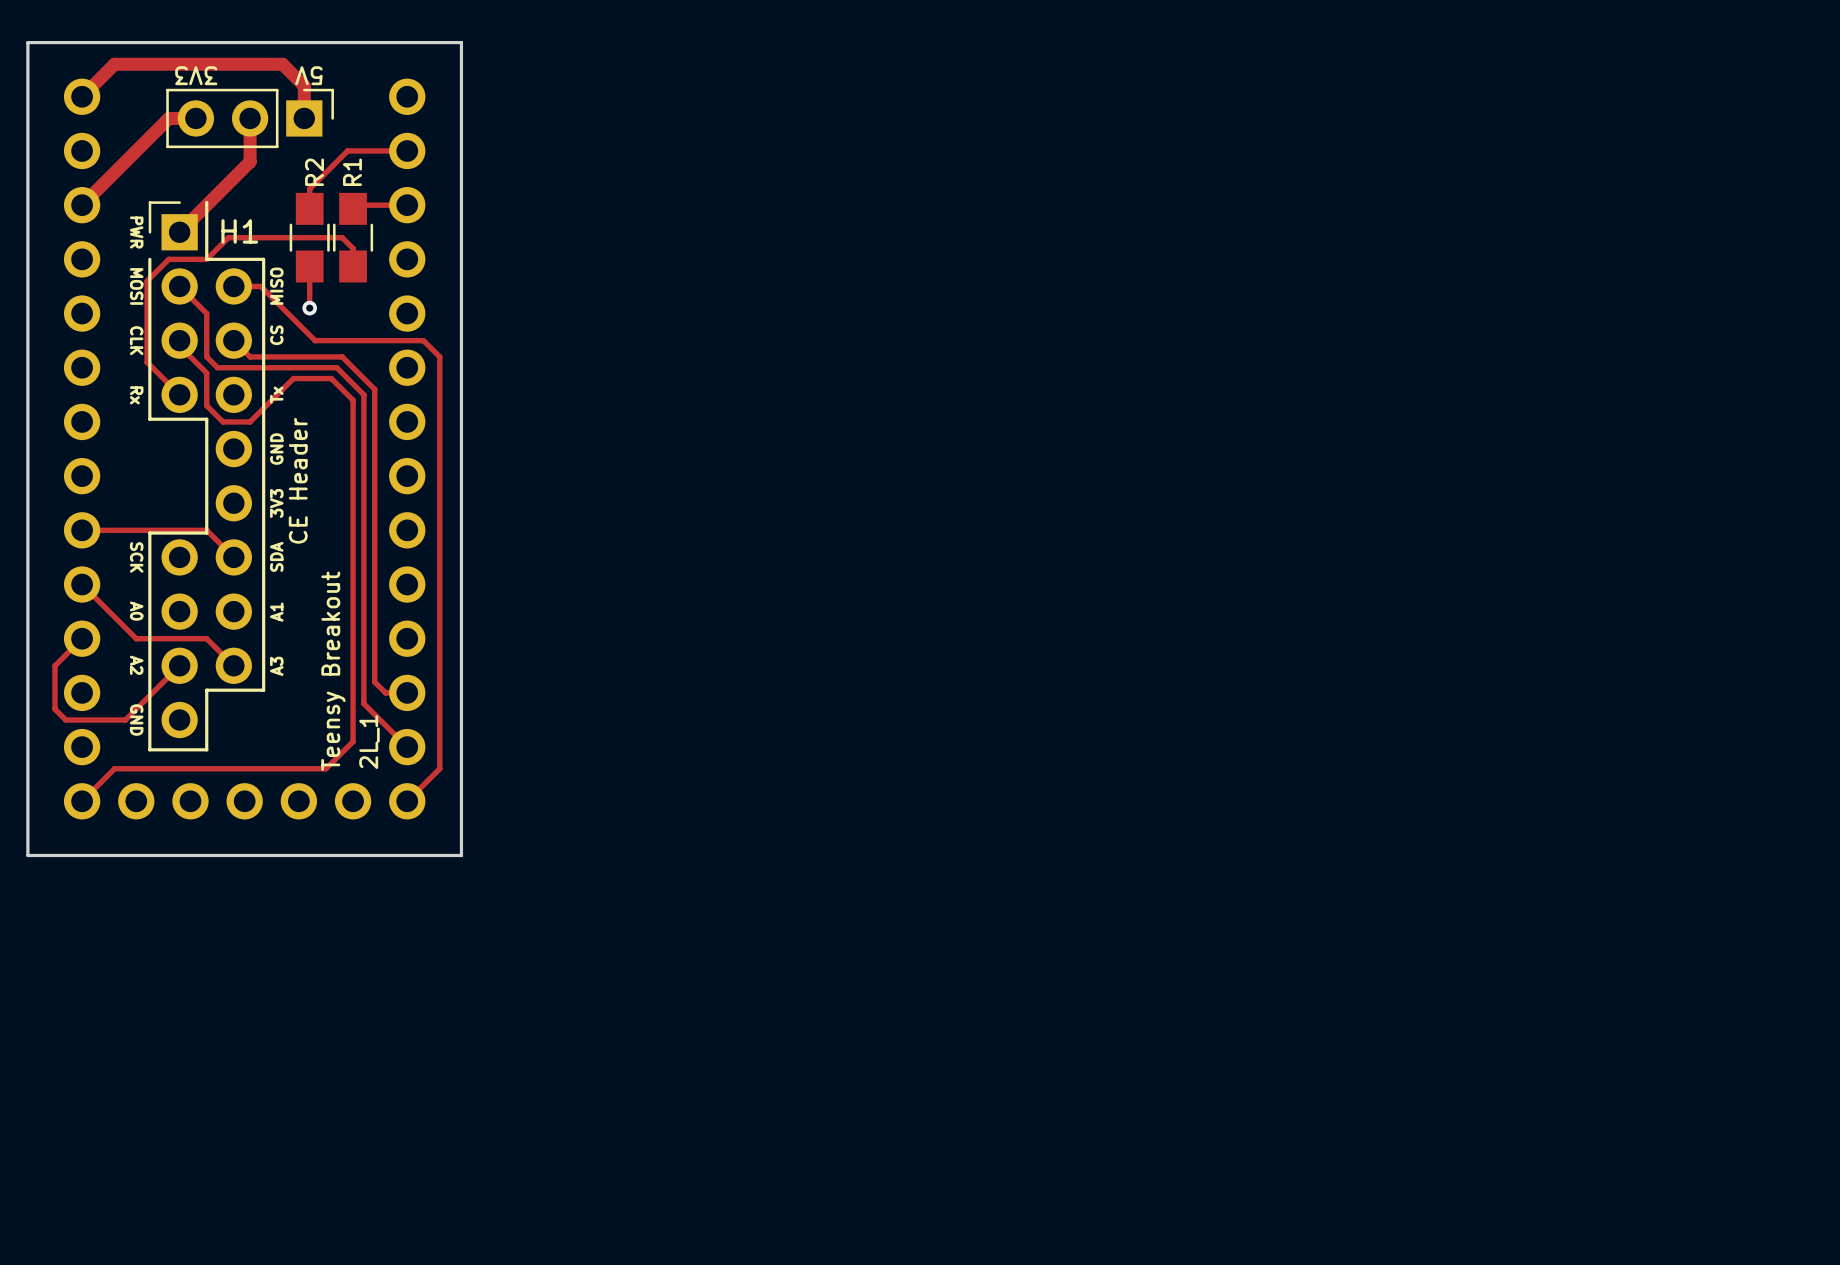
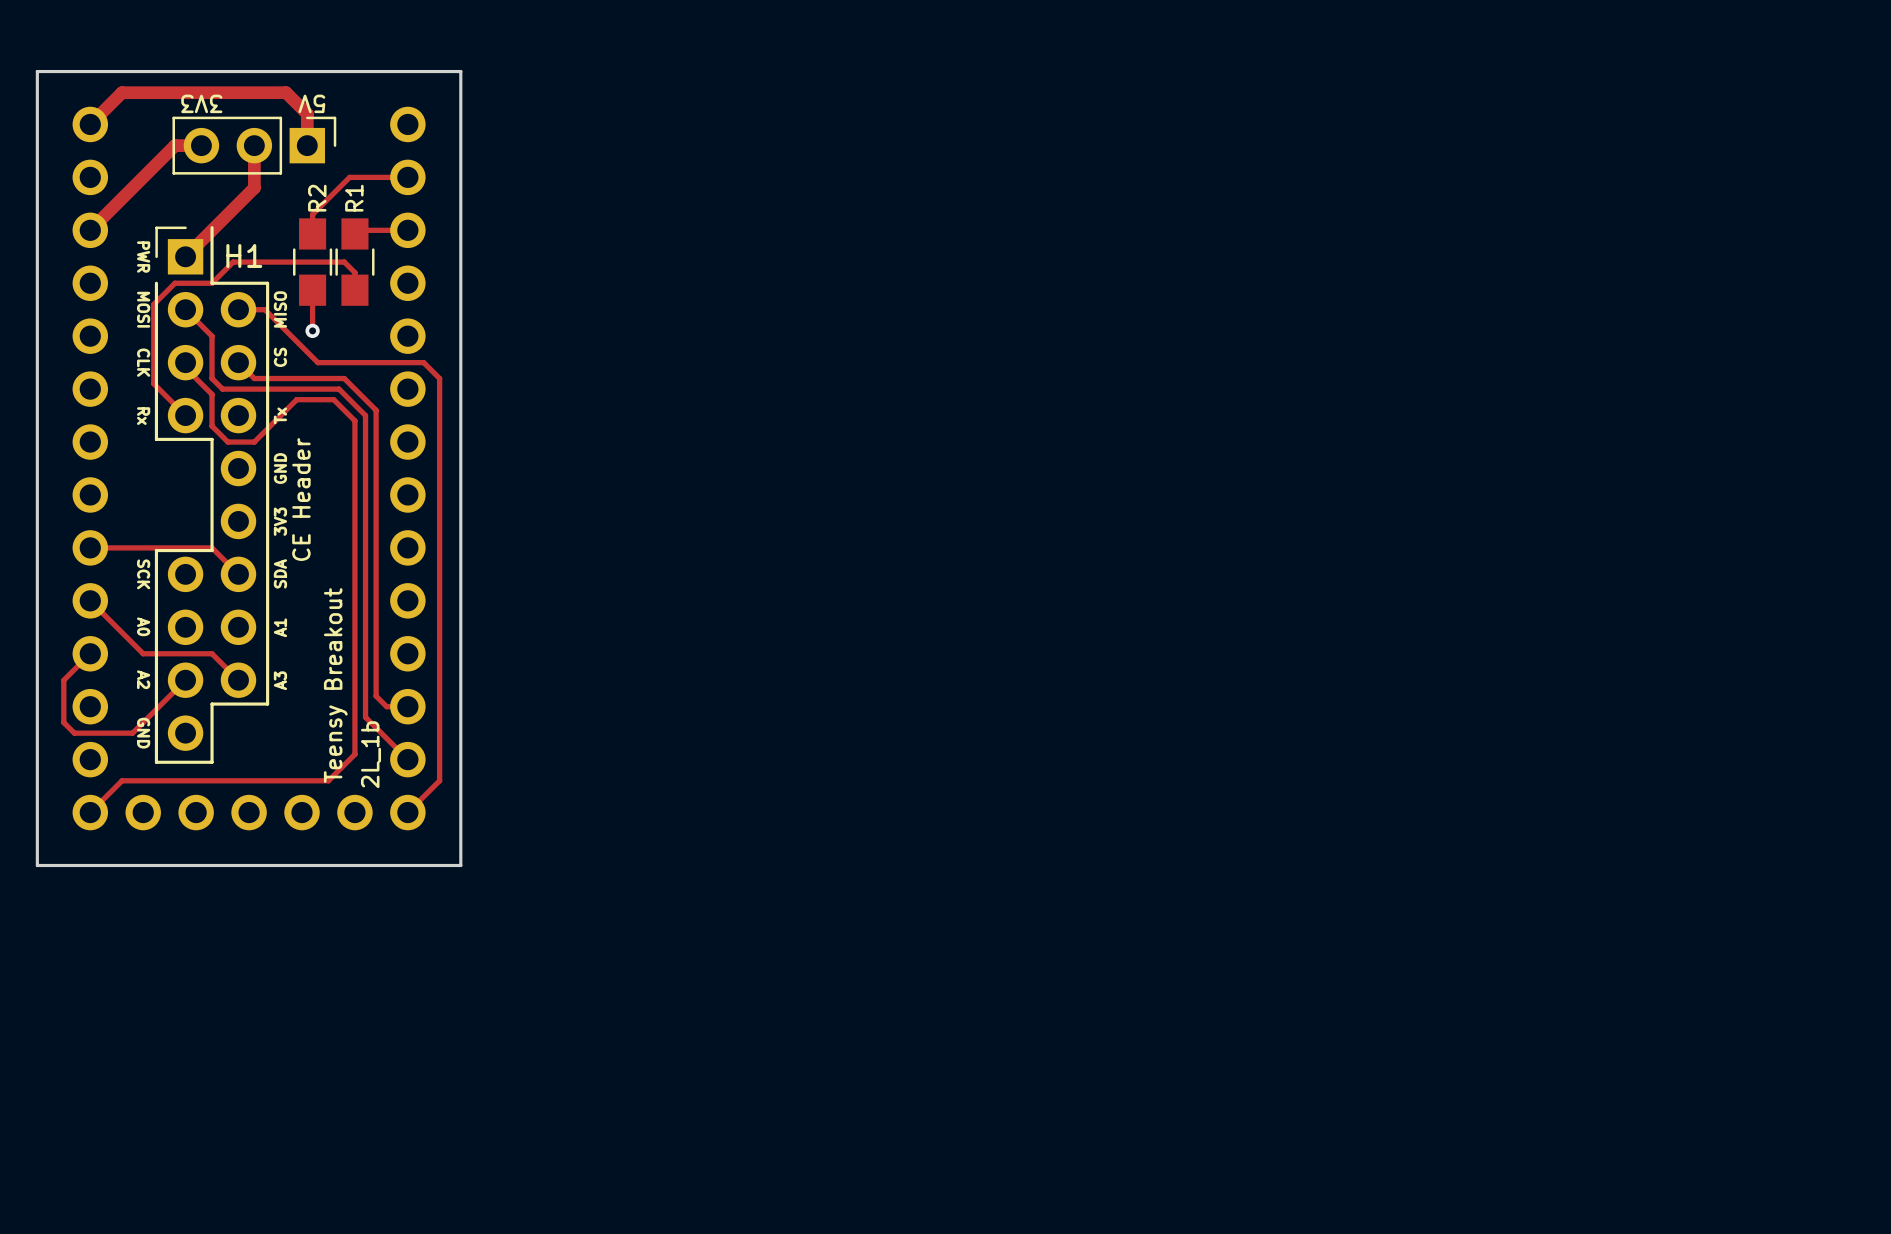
text: 2L_1 (369, 742) -> 2L_1b (370, 754)

